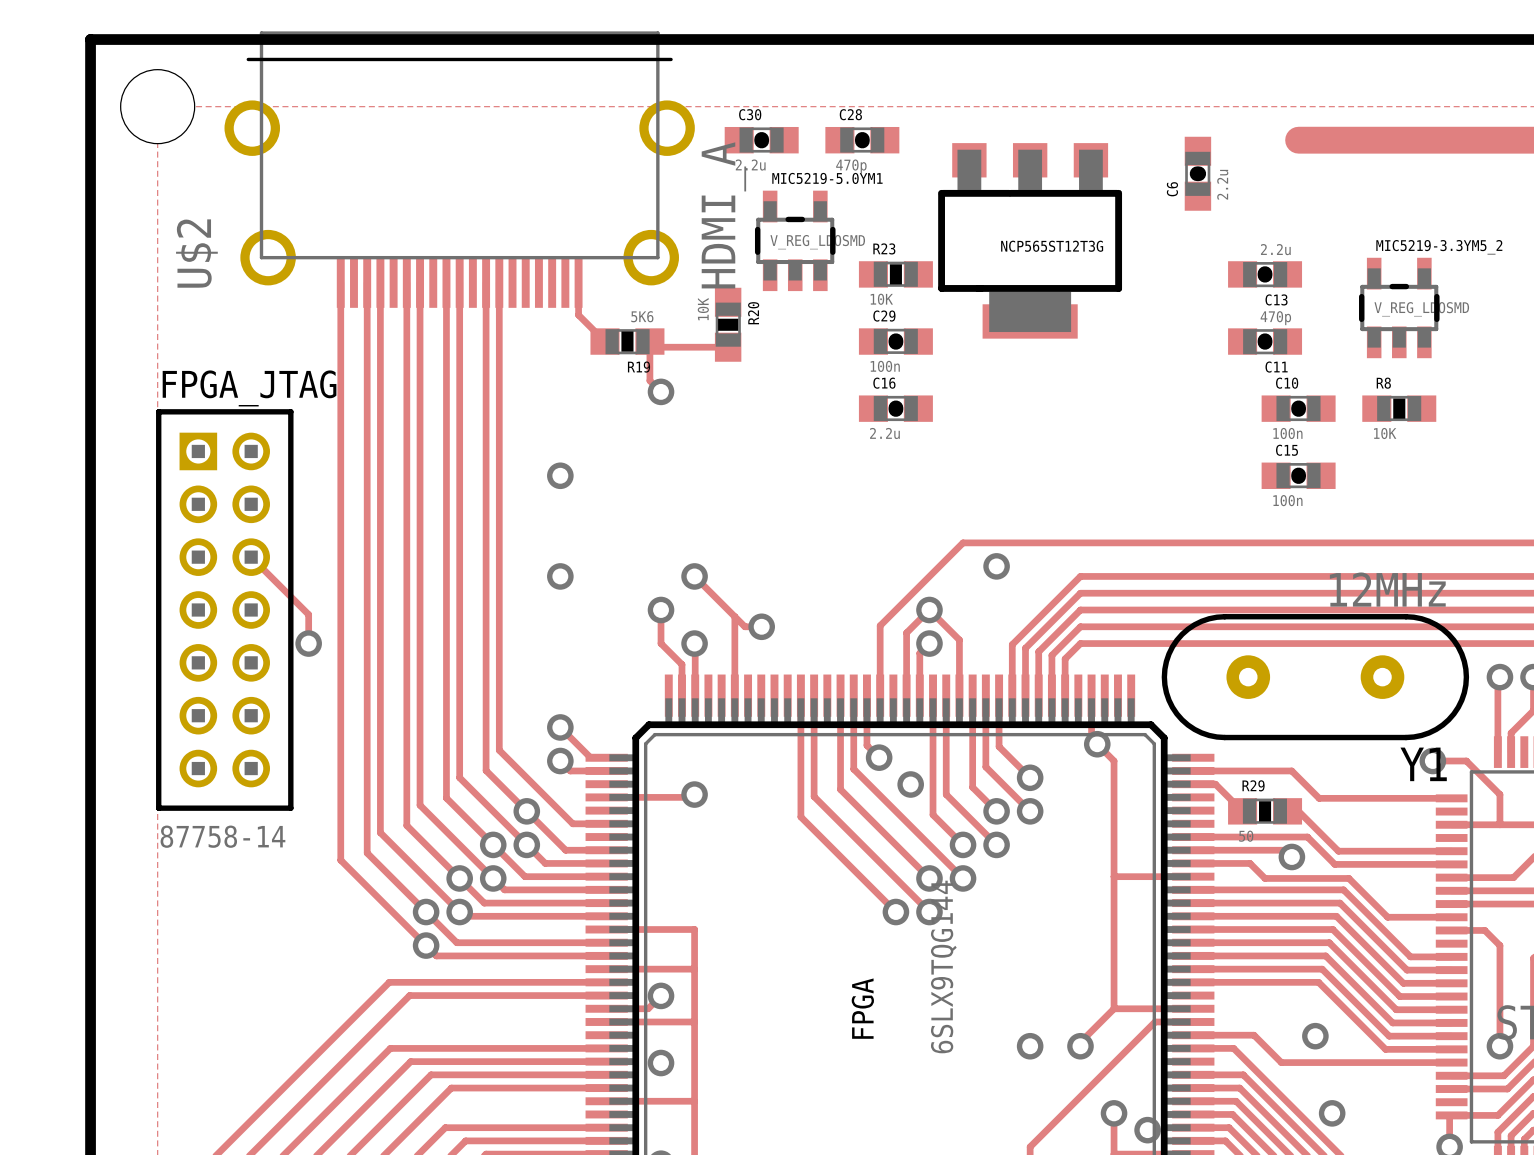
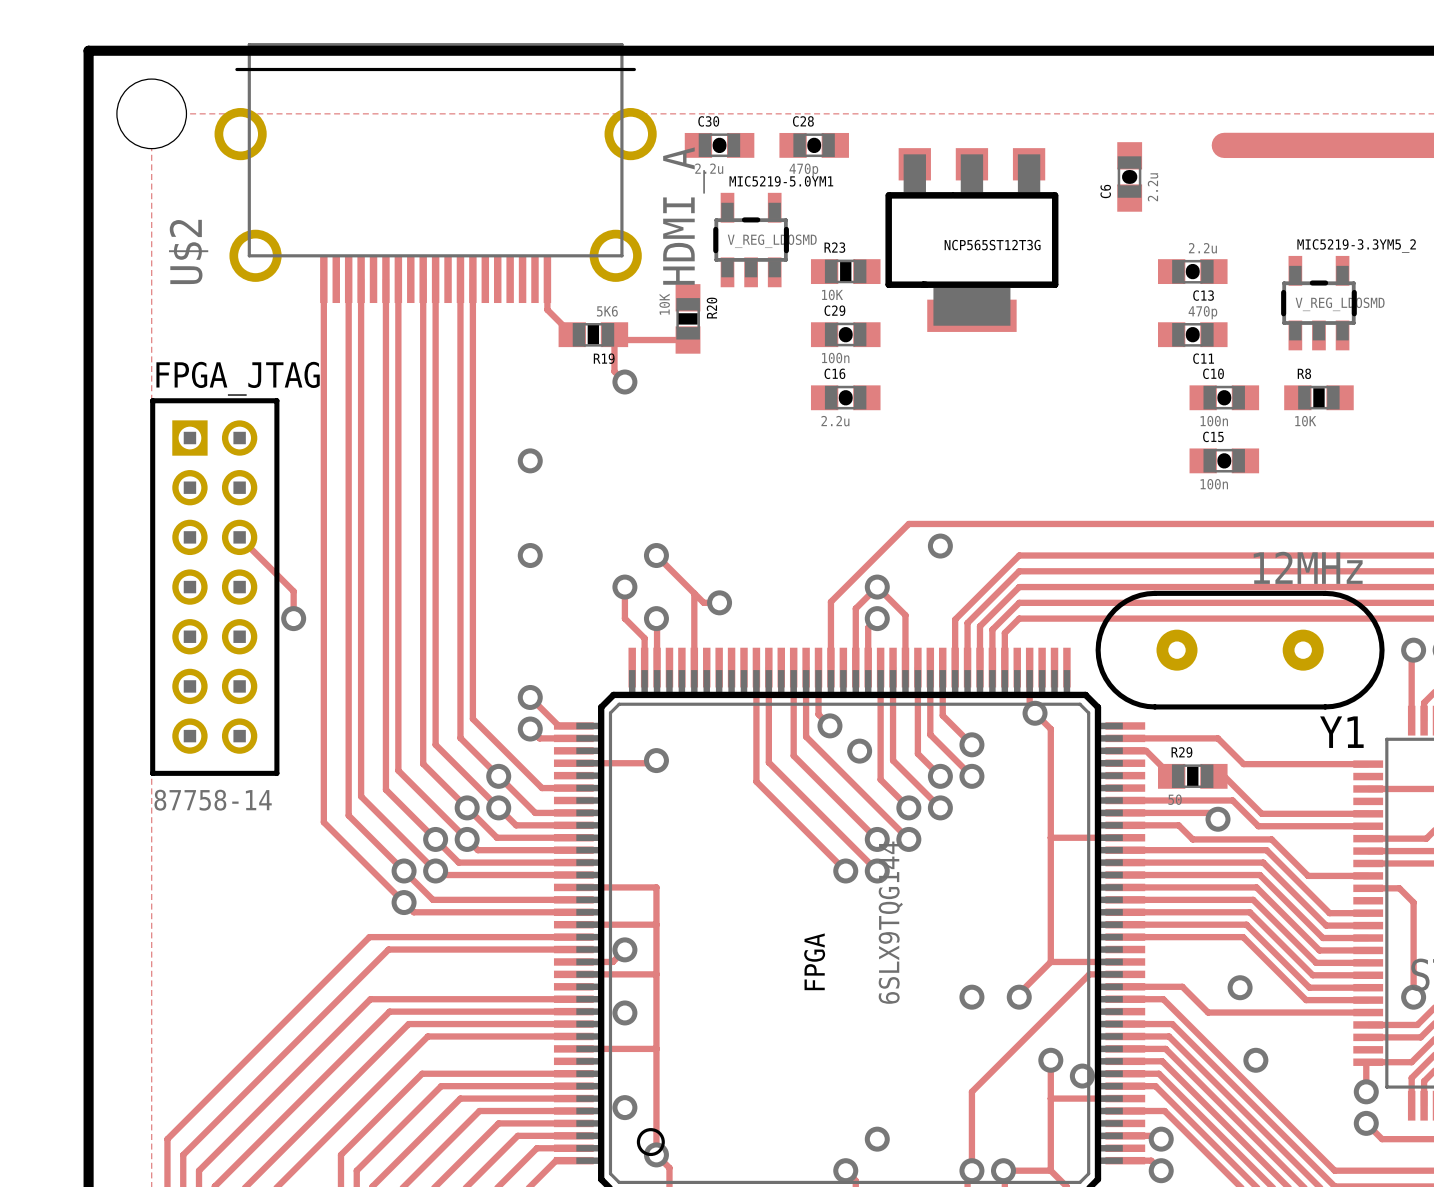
track: (1432, 761) (1466, 761) (1499, 794) (1499, 824) -> none
via: (1432, 761) -> none

